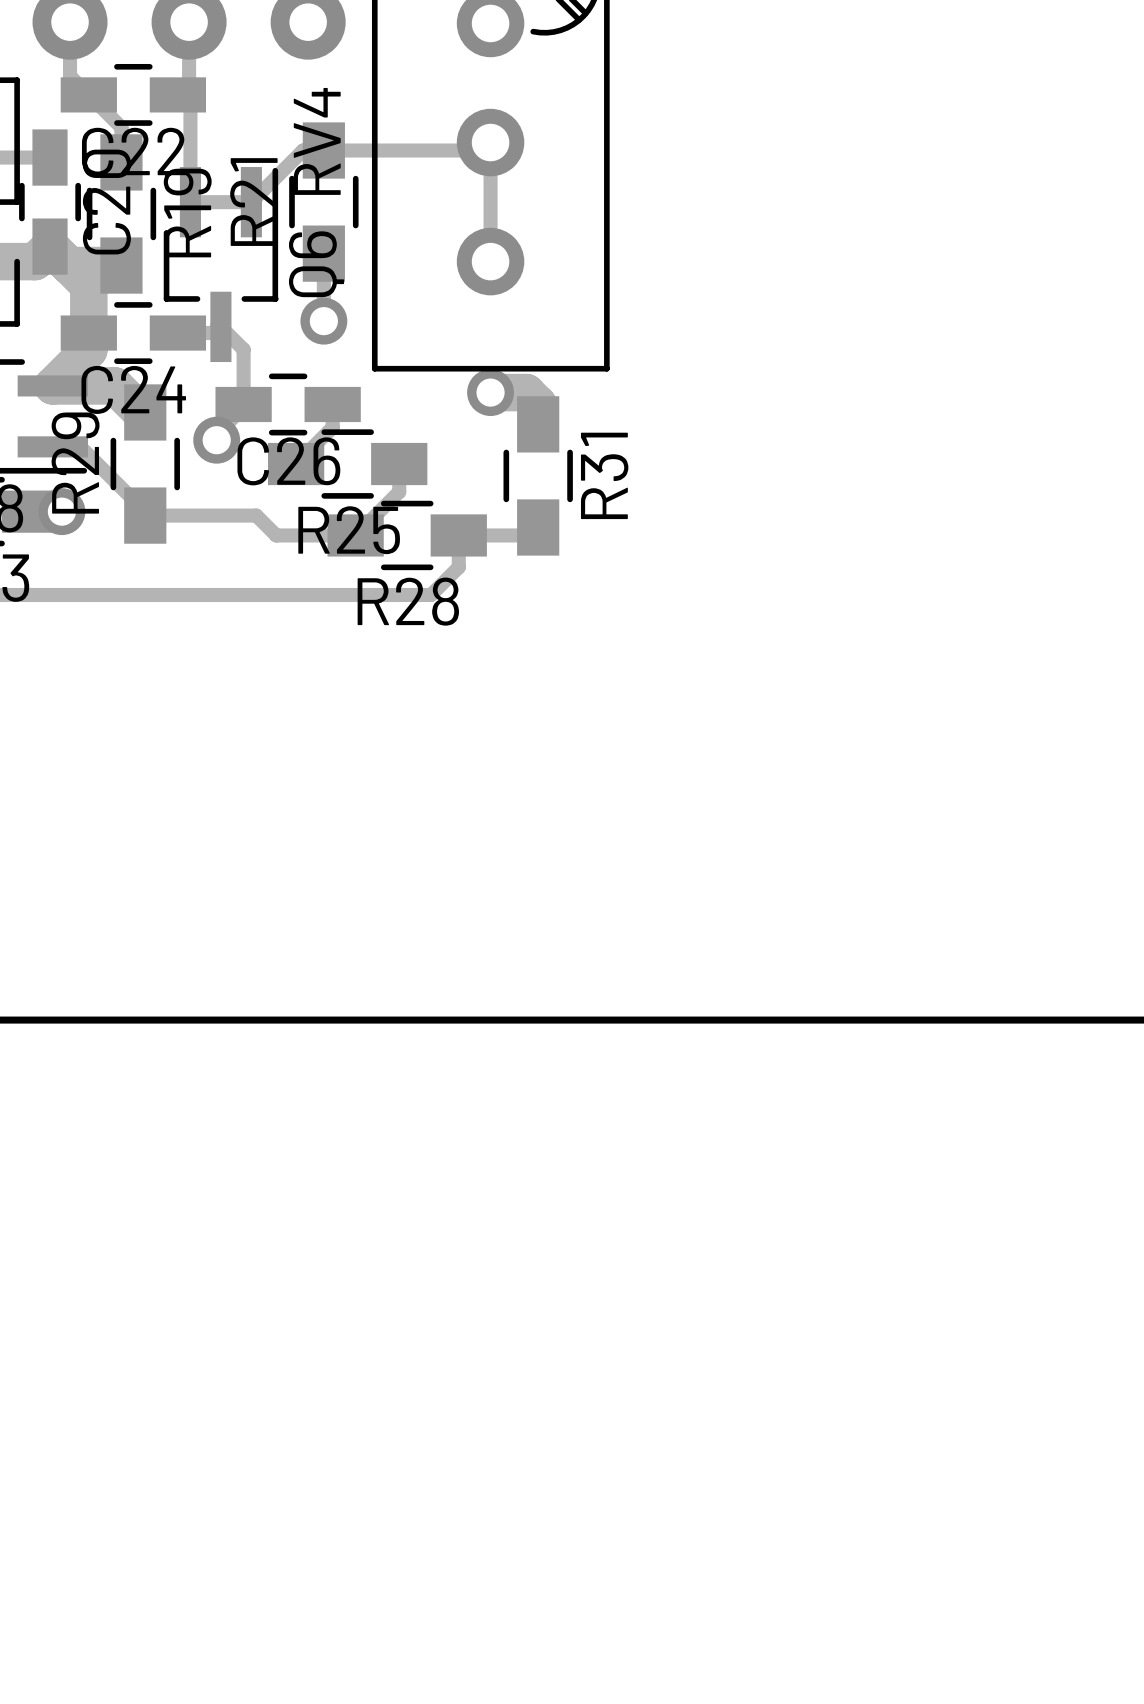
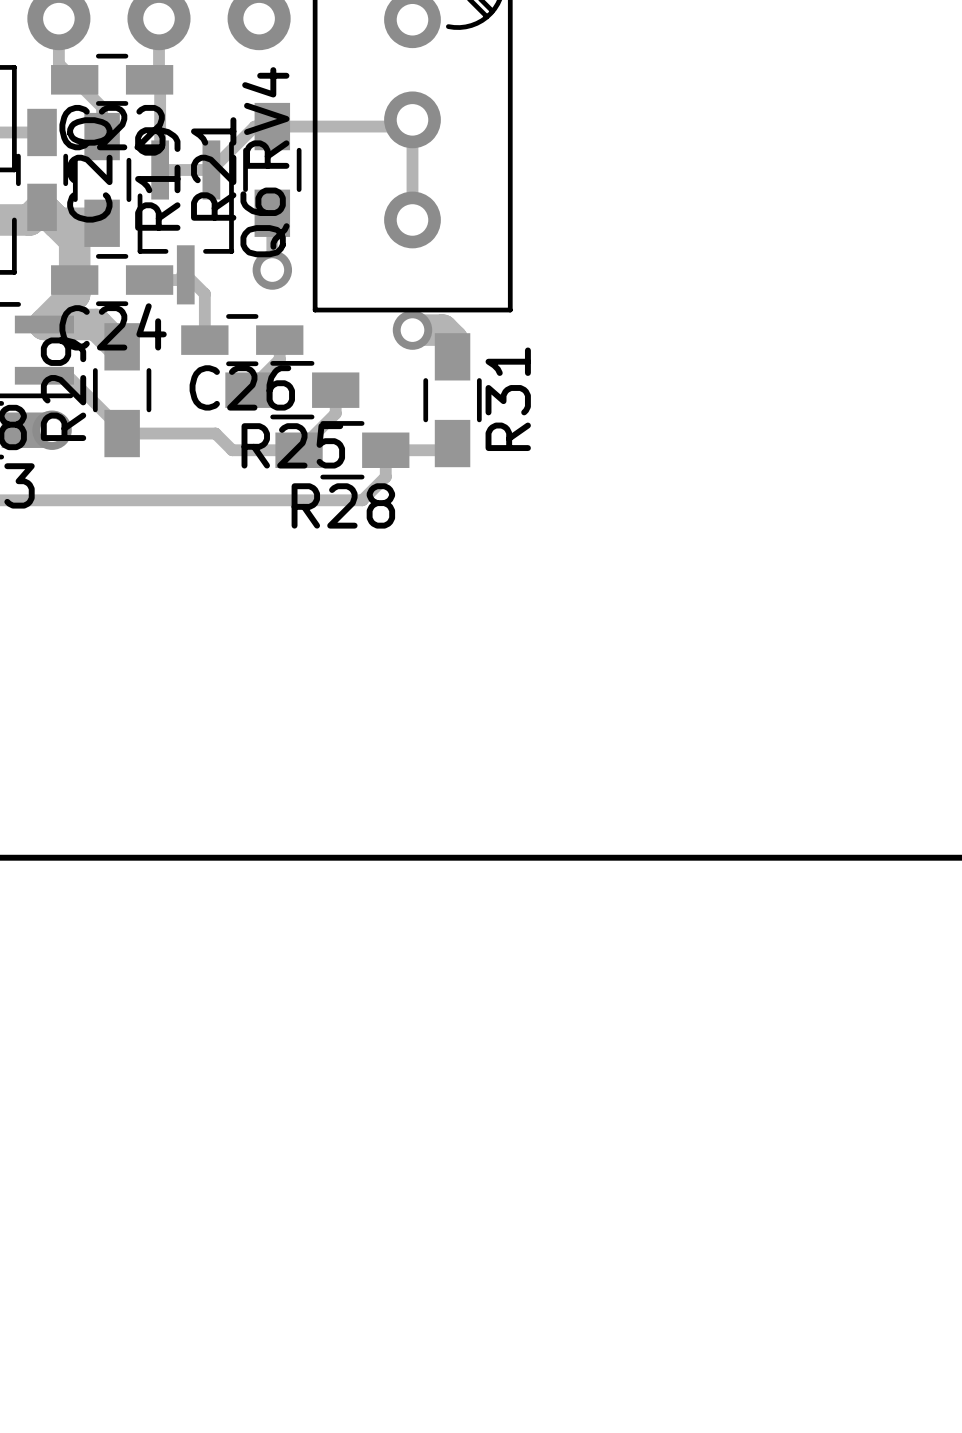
via: (216, 440) -> none

